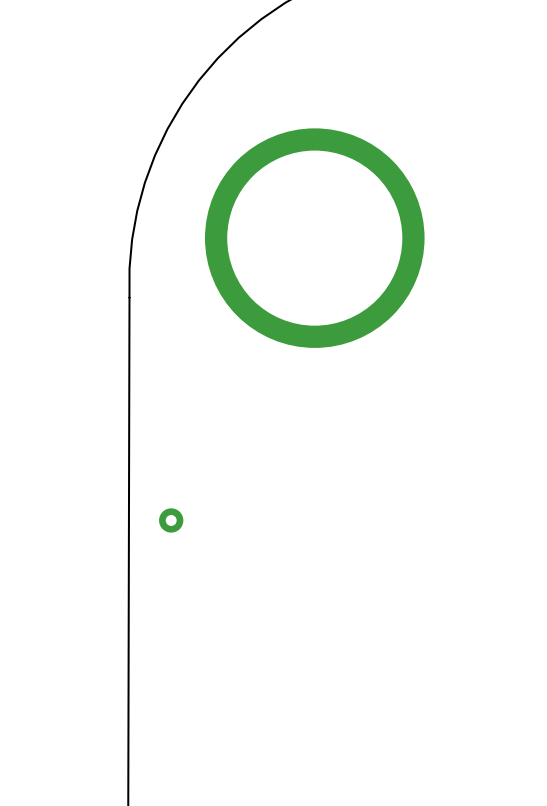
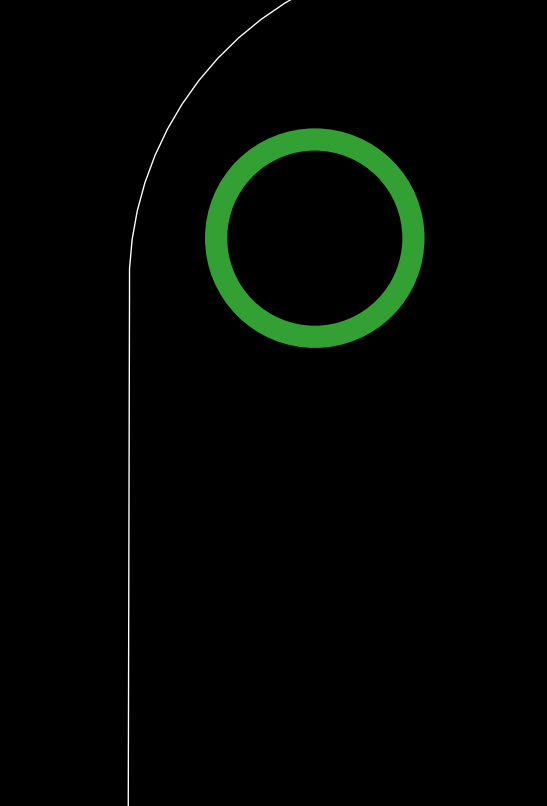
via: (171, 520) -> none

